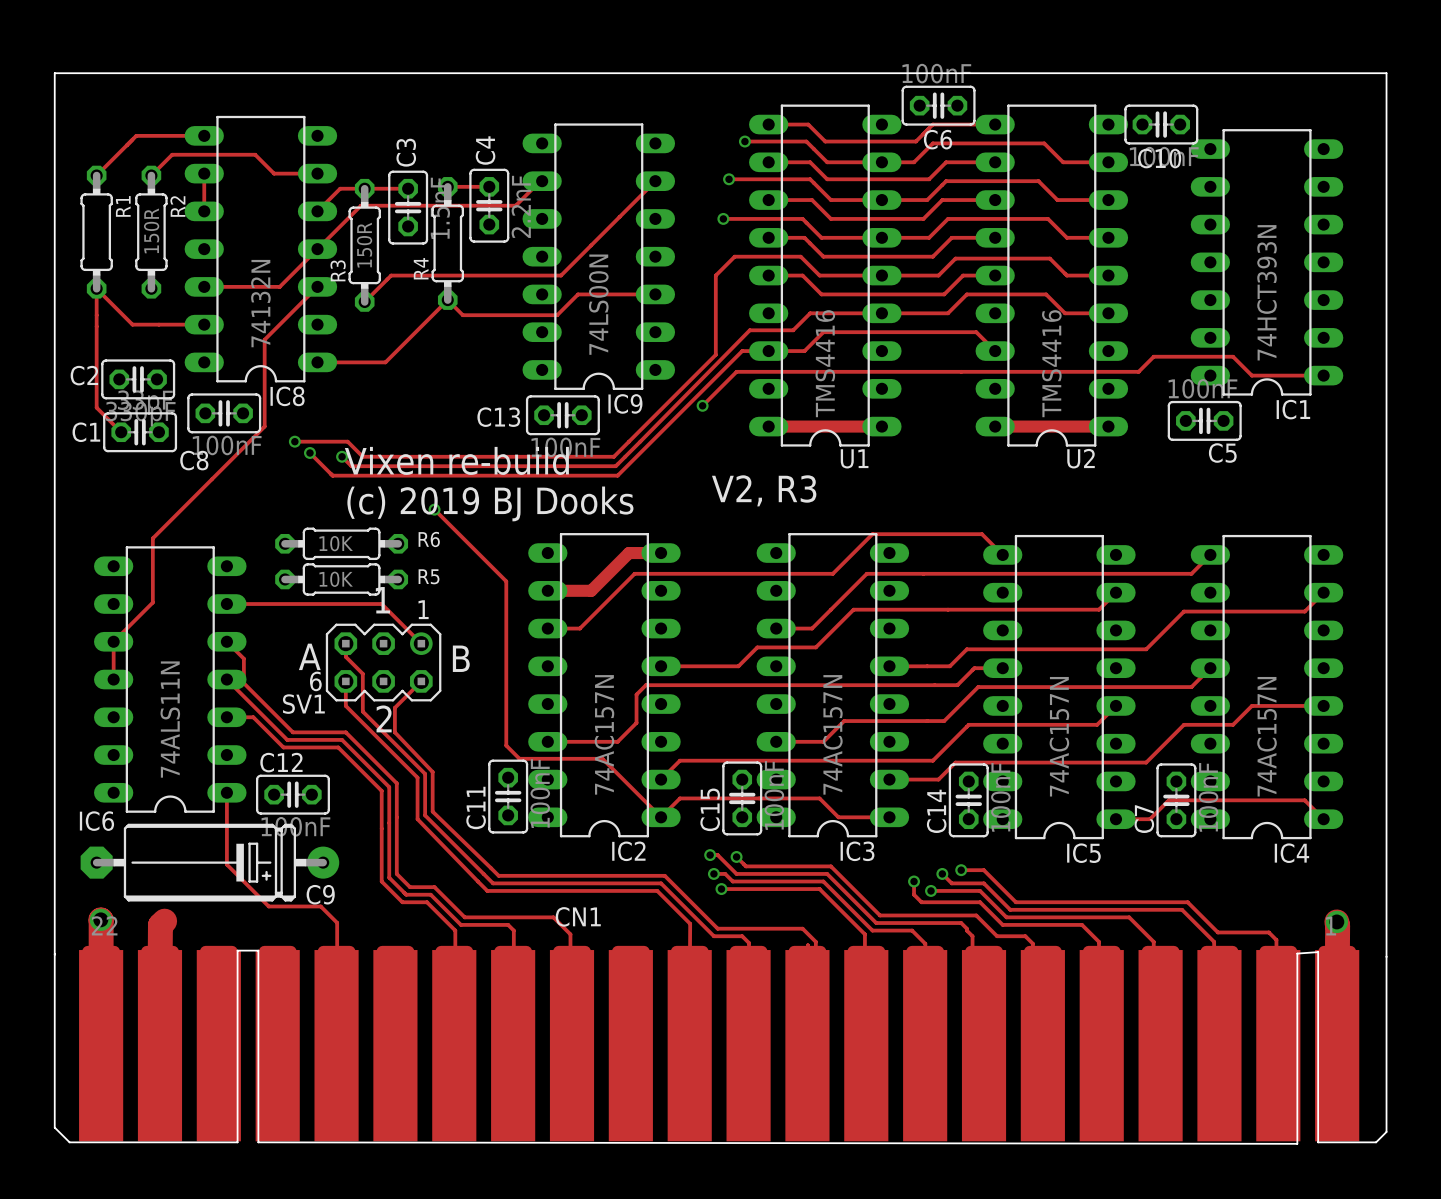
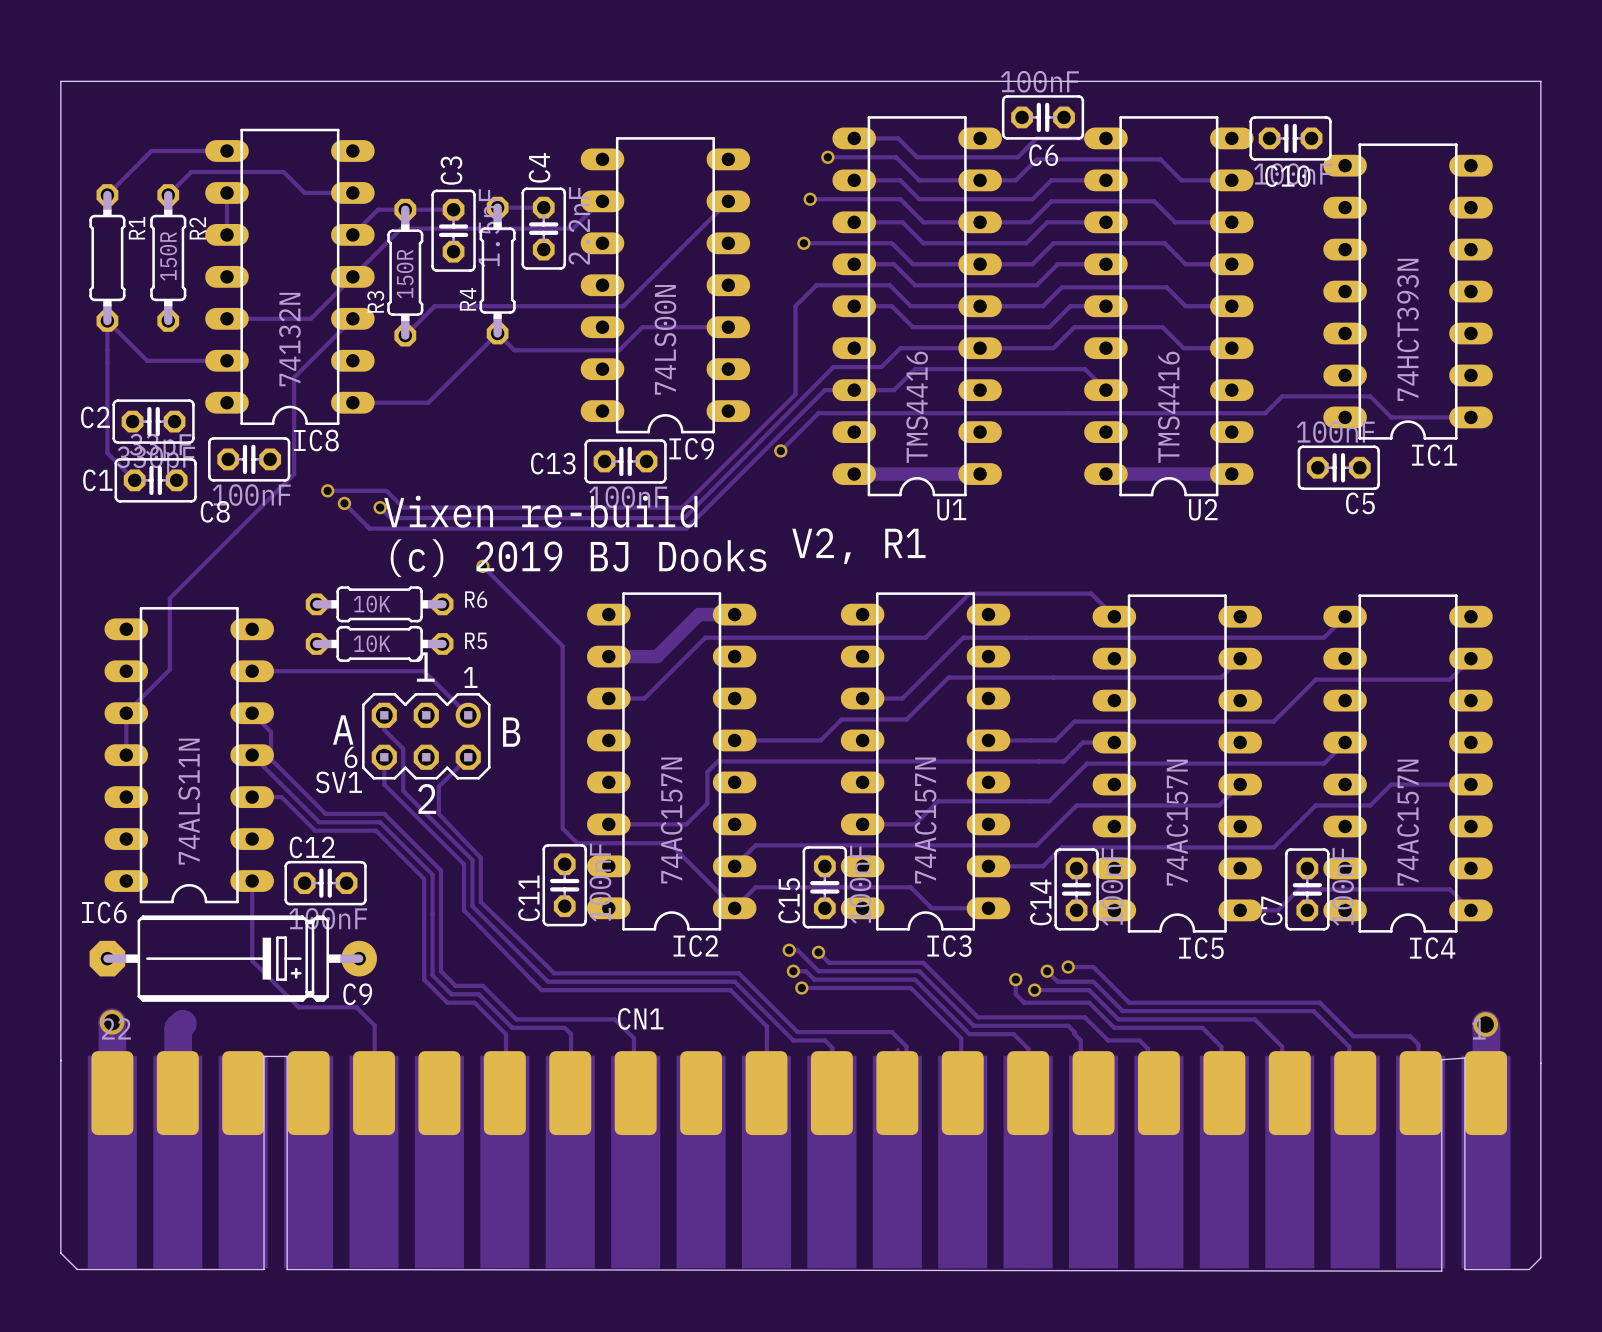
text: V2, R3 (764, 490) -> V2, R1 (858, 546)

